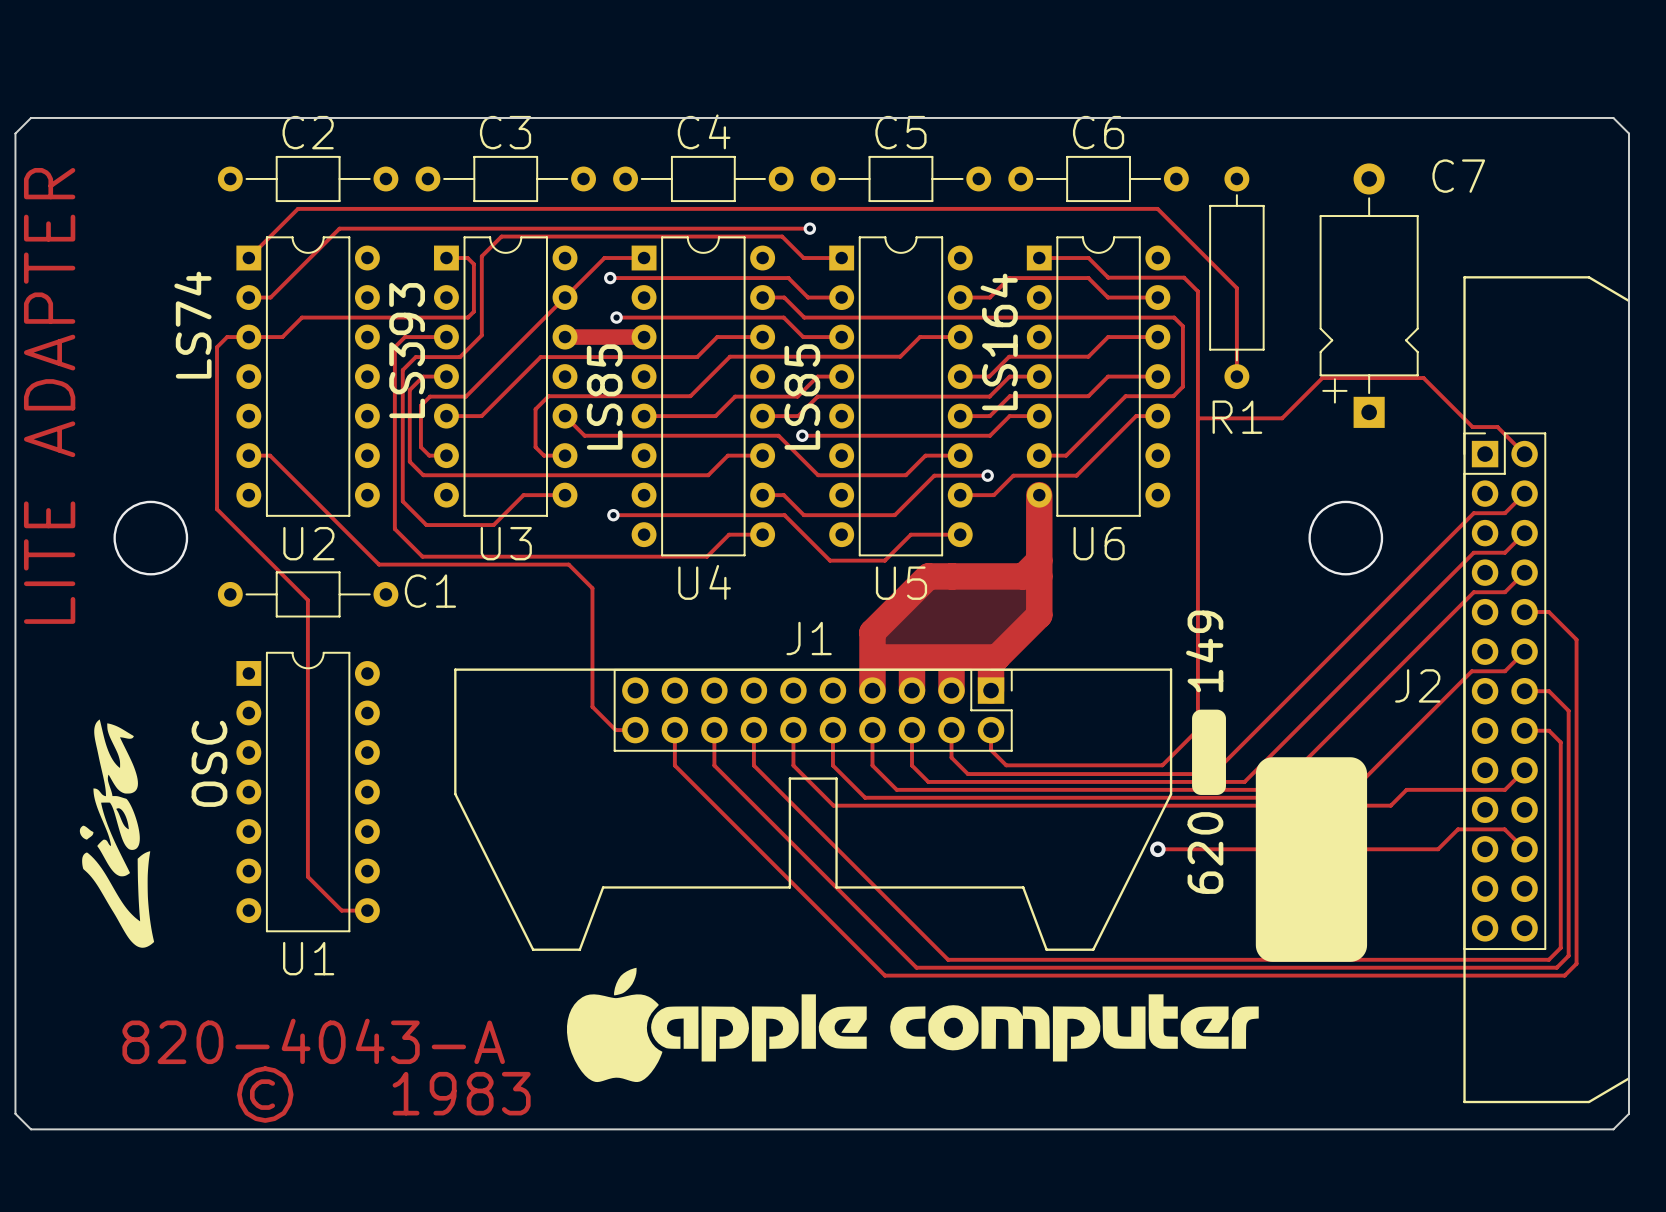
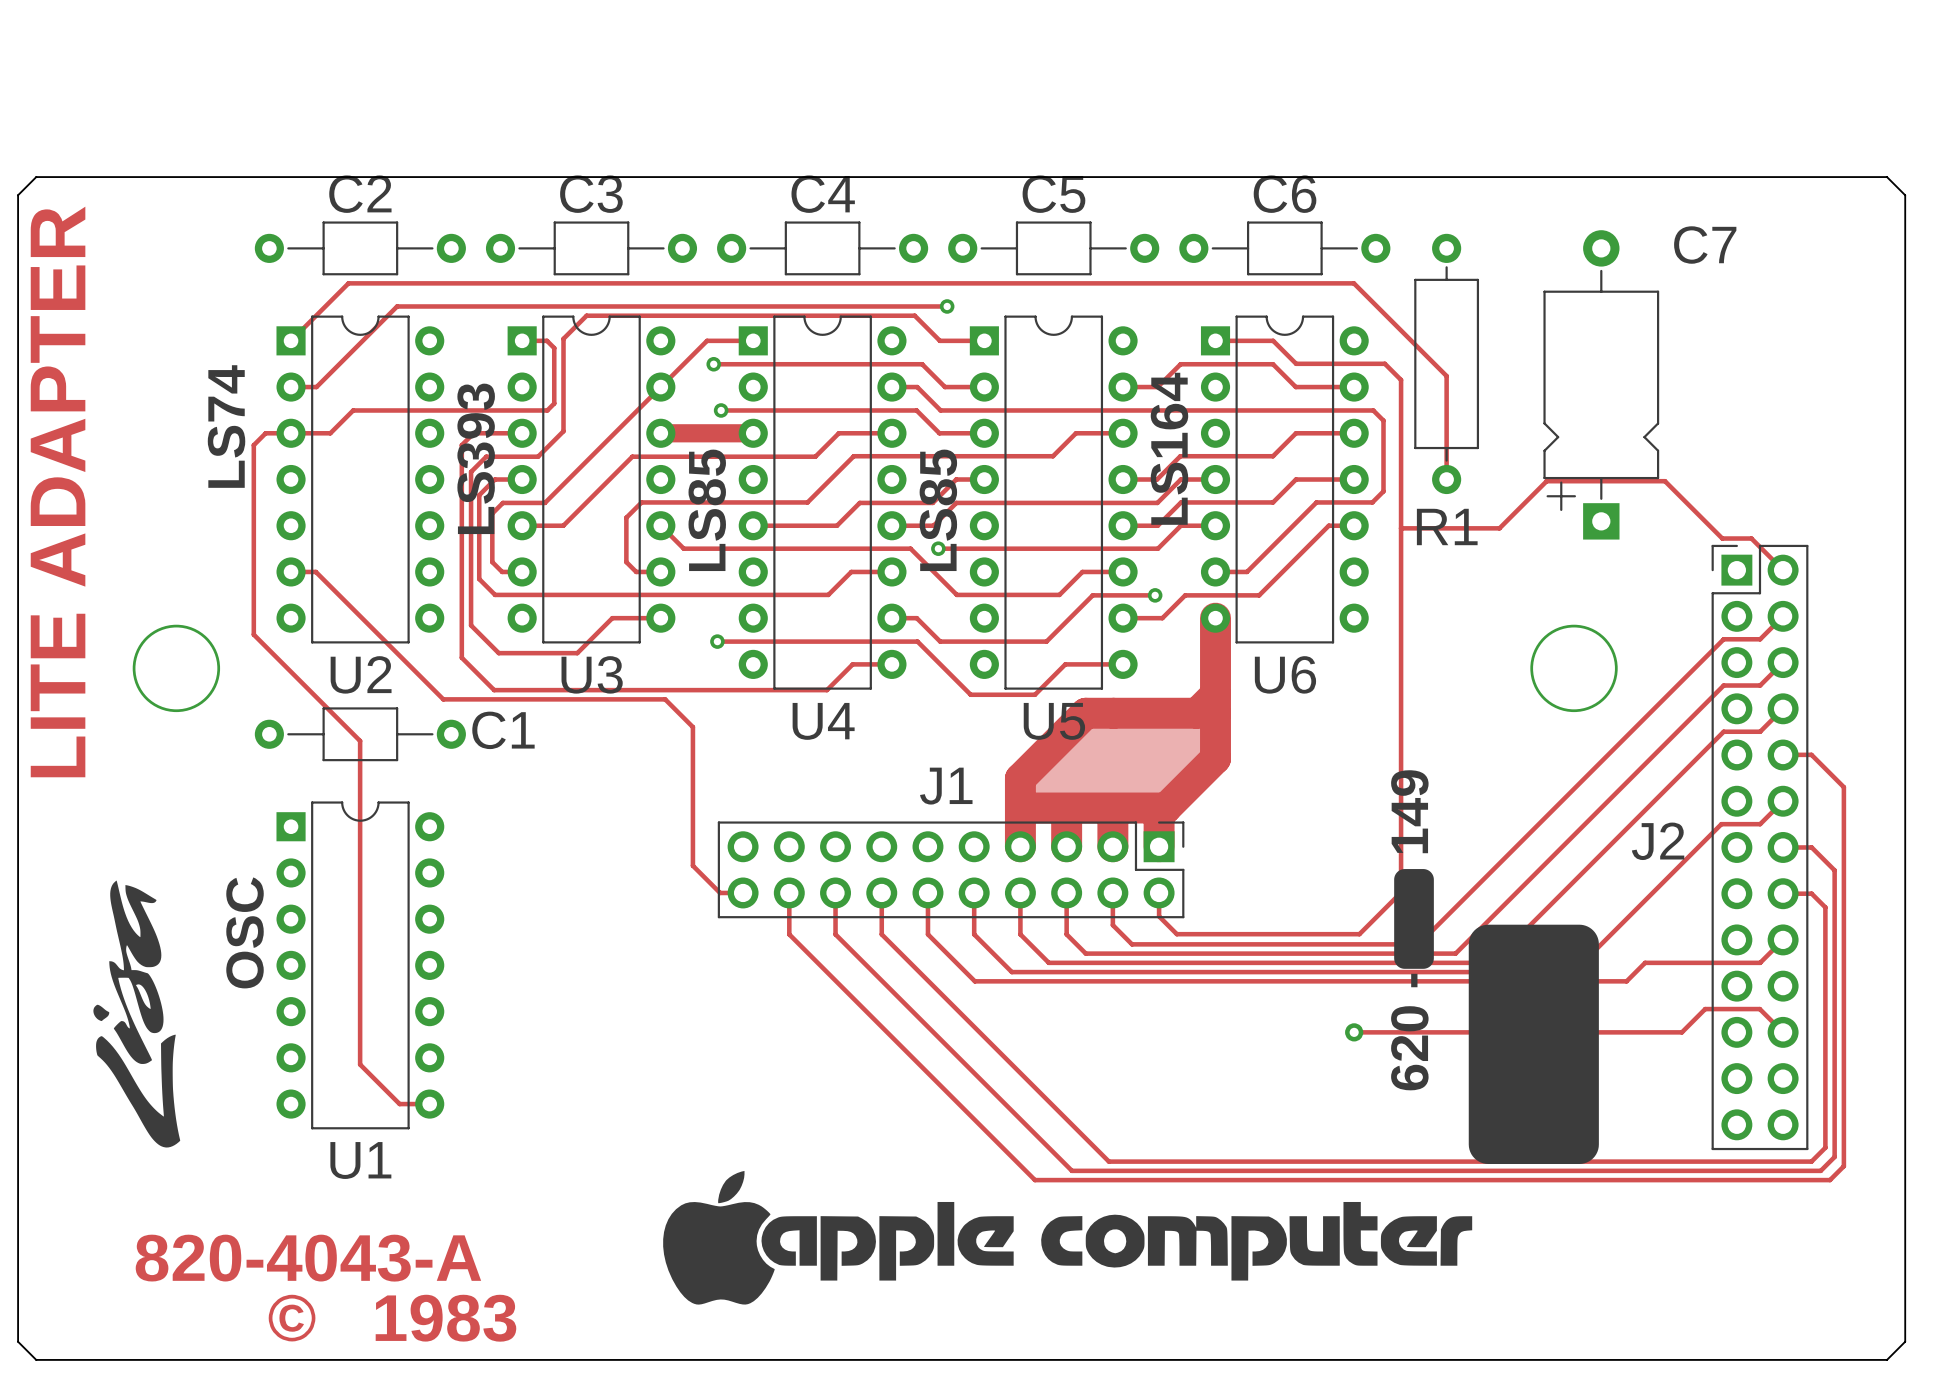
line: (1628, 300) (1588, 277) (1464, 277) (1464, 1102) (1588, 1102) (1628, 1078) -> none
line: (455, 669) (1171, 669) (1171, 794) (1093, 949) (1046, 949) (1023, 887) (836, 887) (836, 778) (789, 778) (789, 887) (603, 887) (579, 949) (533, 949) (455, 794) (455, 669) -> none

